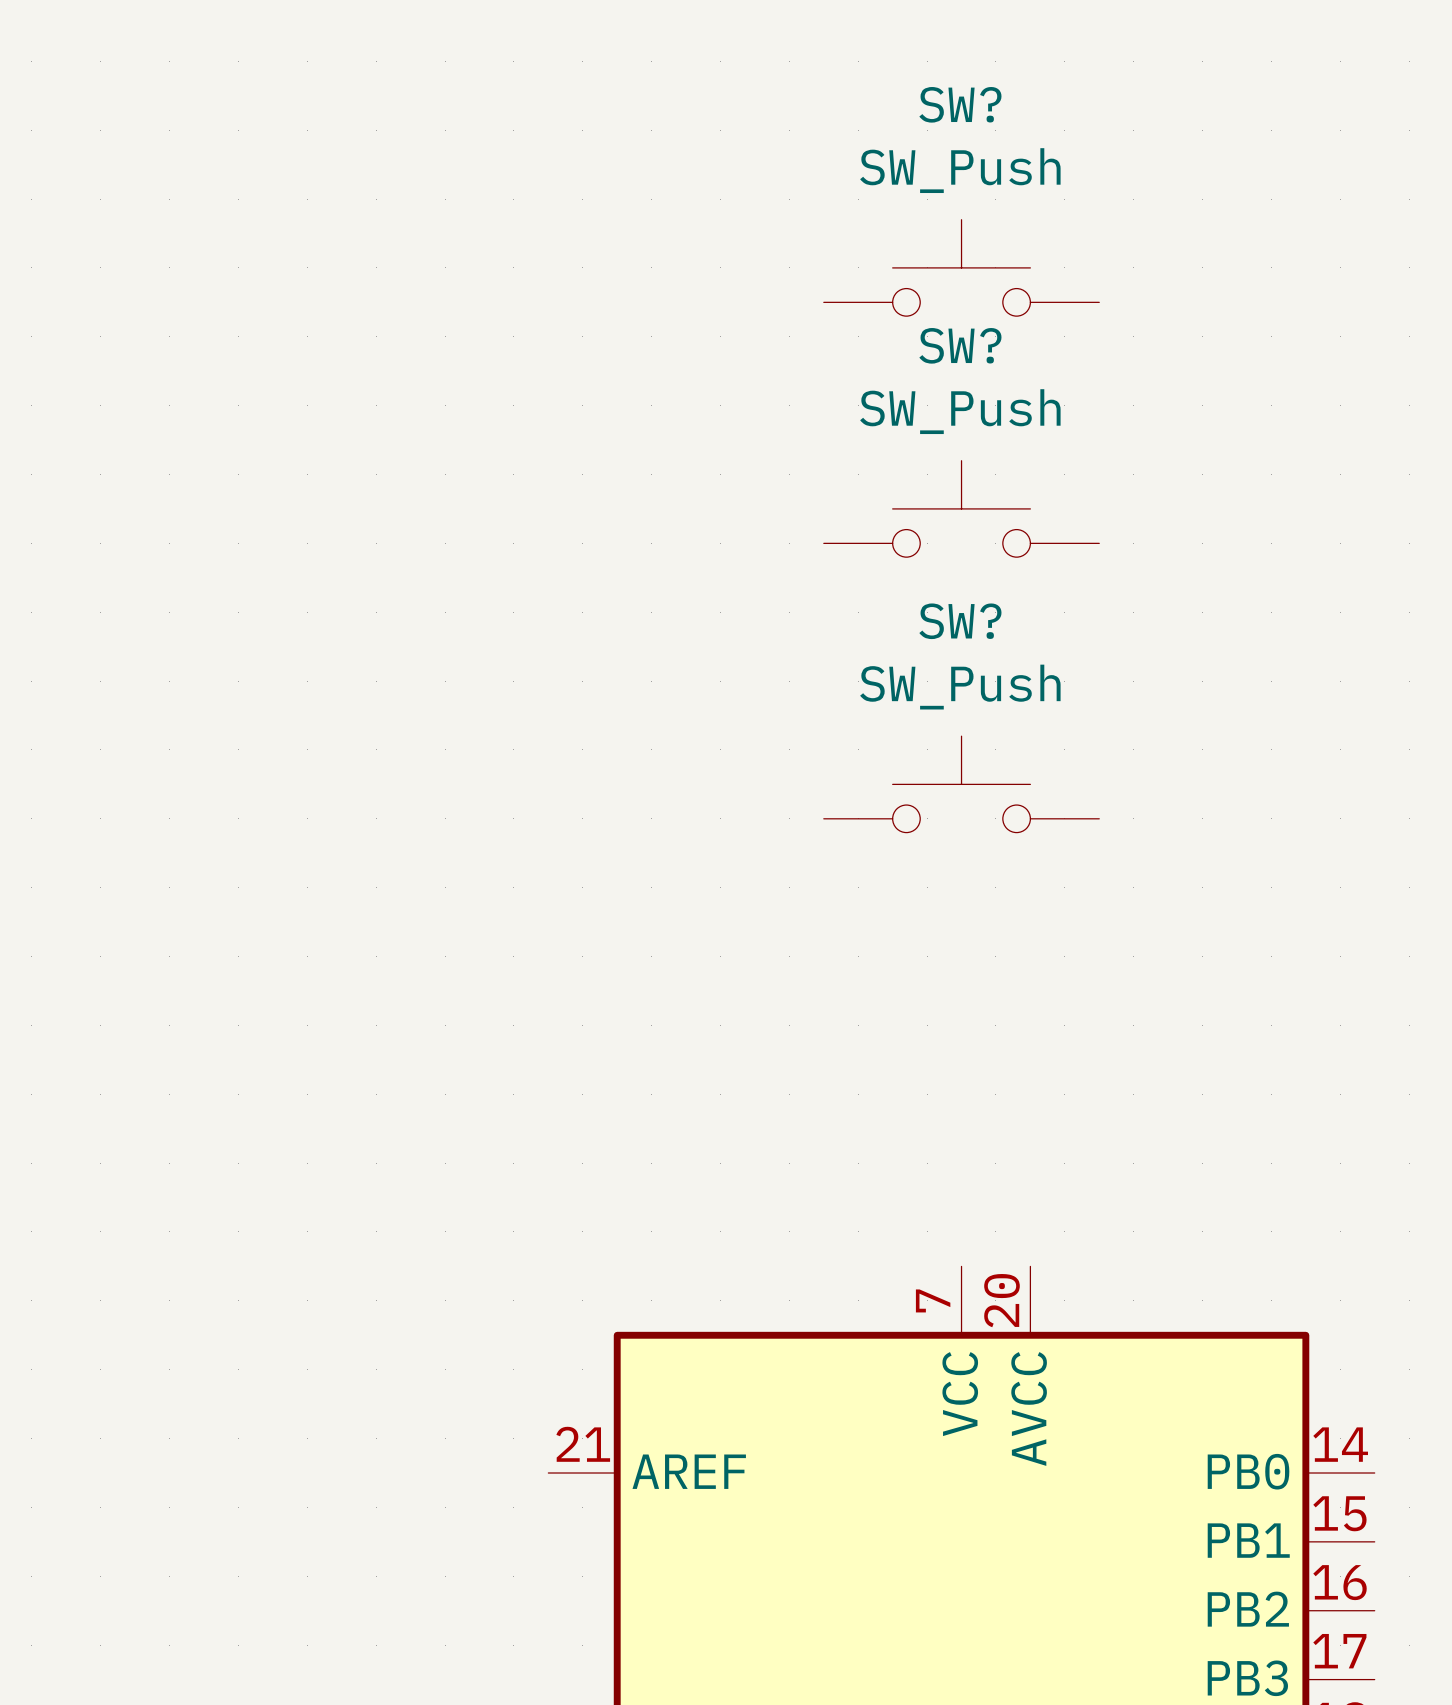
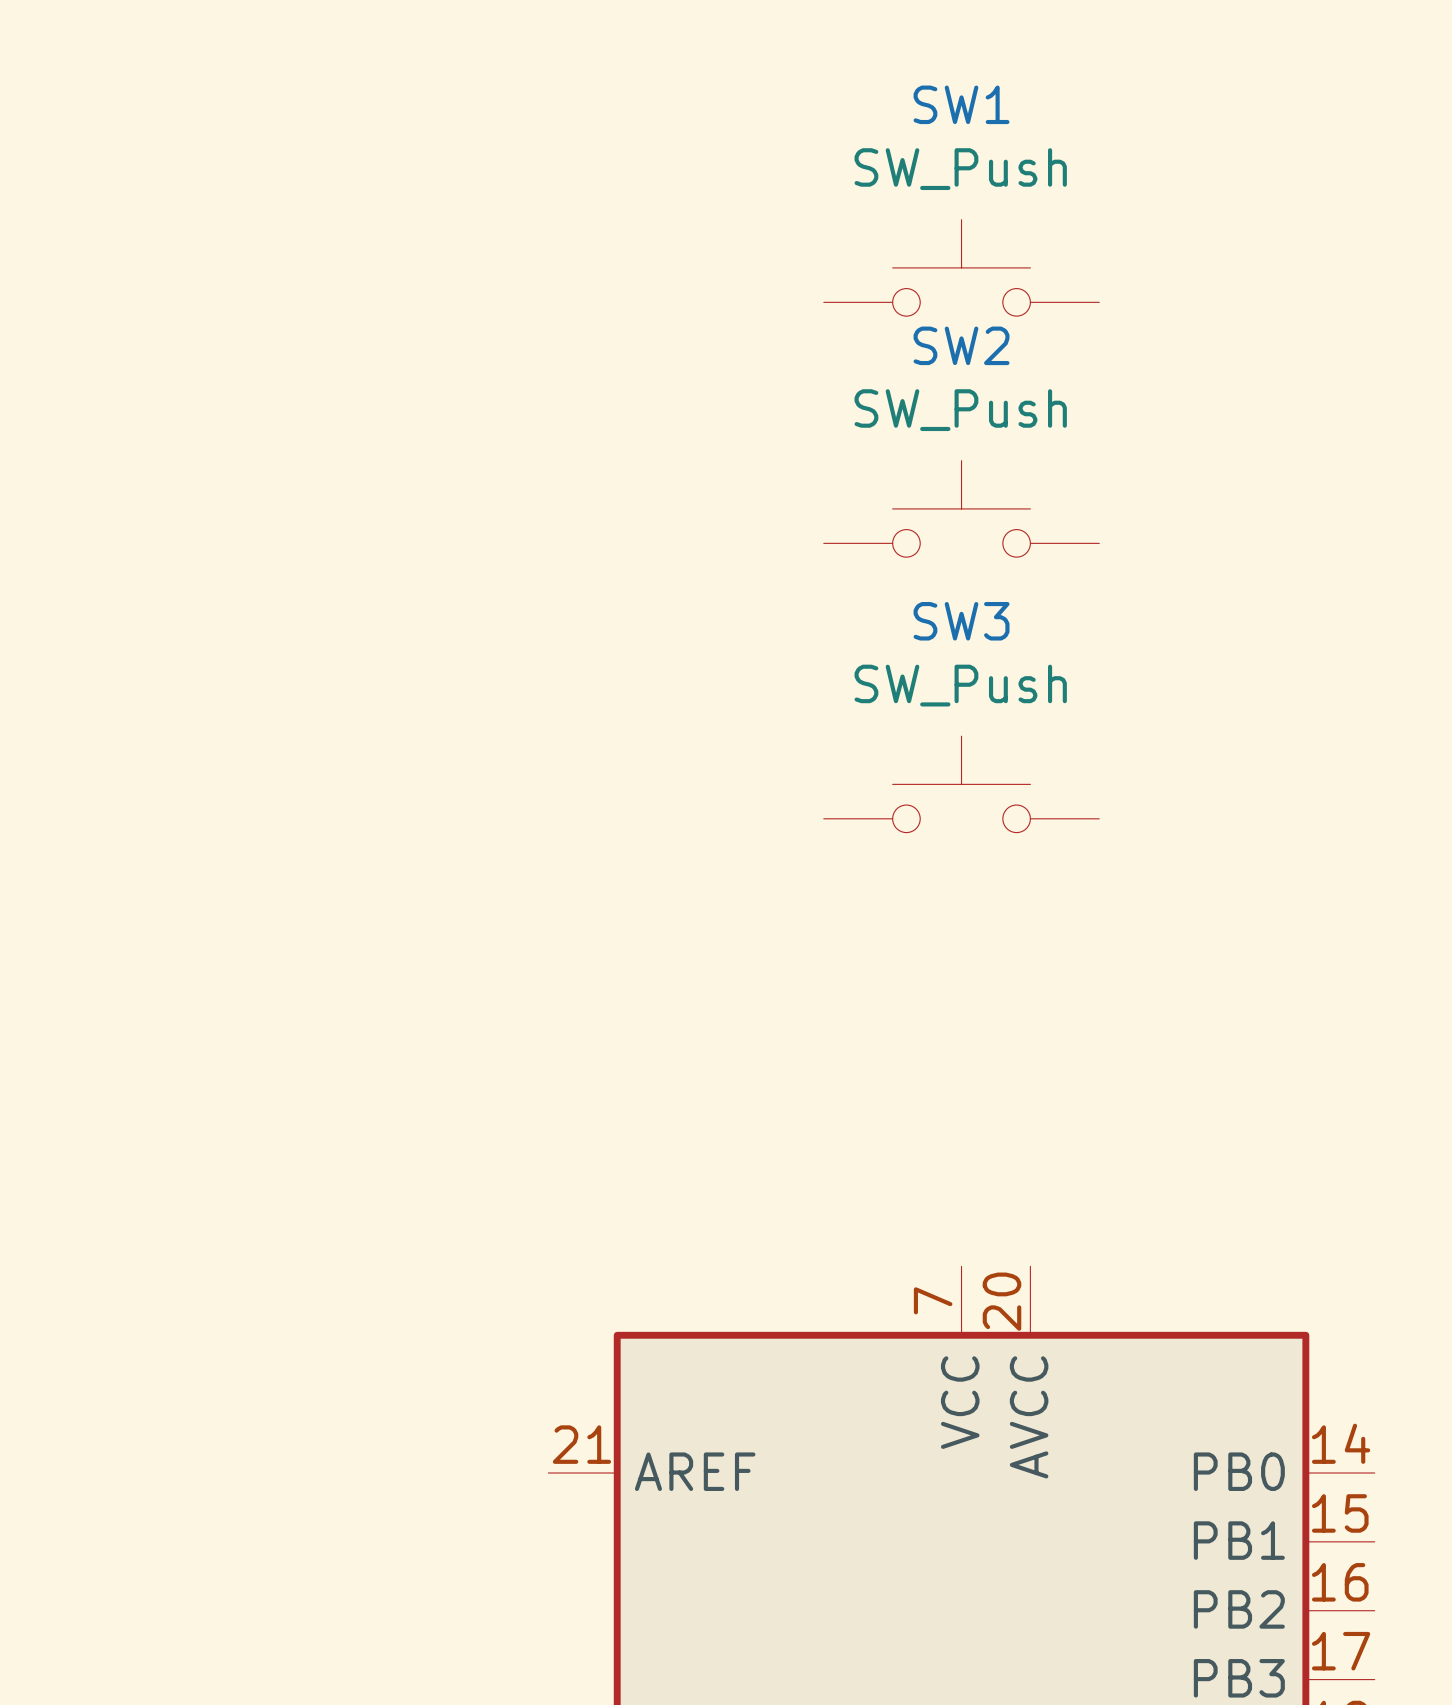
SW? name: SW? (960, 104) -> SW1 (961, 104)
SW? name: SW? (960, 345) -> SW2 (961, 345)
SW? name: SW? (960, 621) -> SW3 (961, 621)

